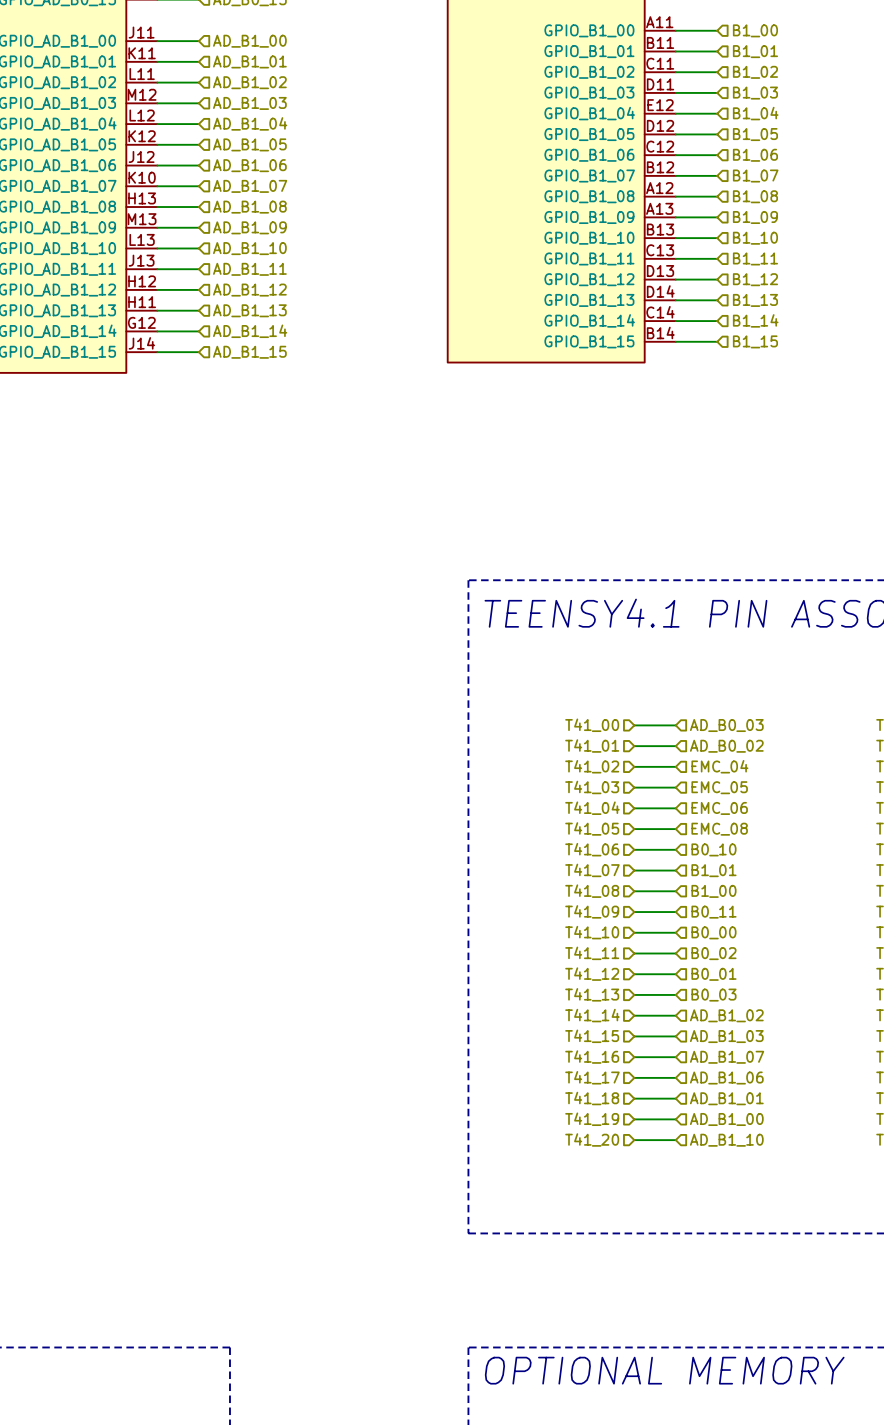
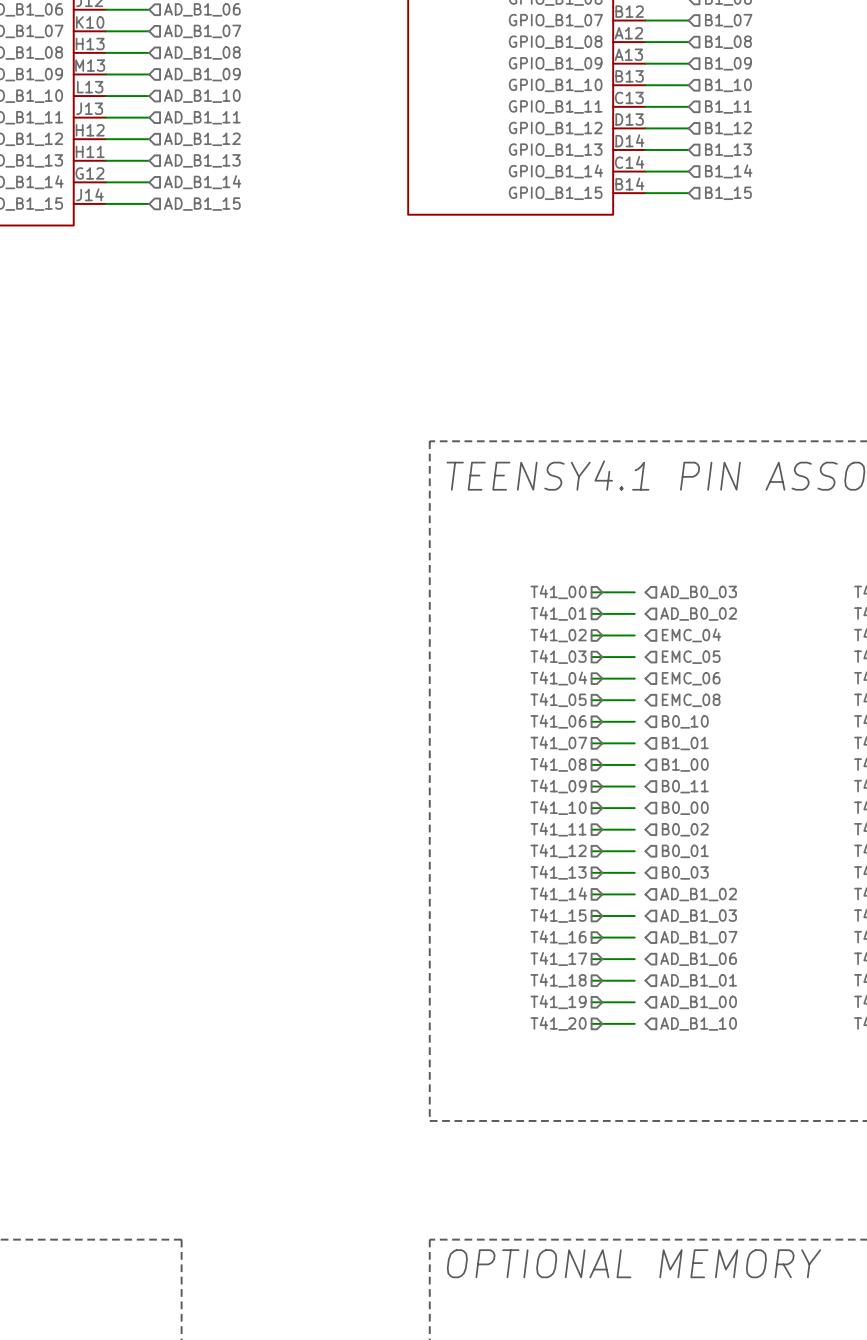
wire: (665, 725) (675, 725) -> (591, 592) (602, 592)
wire: (665, 746) (675, 746) -> (591, 613) (602, 613)
wire: (665, 766) (675, 766) -> (591, 635) (602, 635)
wire: (665, 787) (675, 787) -> (591, 657) (602, 657)
wire: (665, 808) (675, 808) -> (591, 678) (602, 678)
wire: (665, 829) (675, 829) -> (591, 700) (602, 700)
wire: (665, 849) (675, 849) -> (591, 721) (602, 721)
wire: (665, 870) (675, 870) -> (591, 743) (602, 743)
wire: (665, 891) (675, 891) -> (591, 764) (602, 764)
wire: (665, 912) (675, 912) -> (591, 786) (602, 786)
wire: (665, 932) (675, 932) -> (591, 808) (602, 808)
wire: (665, 953) (675, 953) -> (591, 829) (602, 829)
wire: (665, 974) (675, 974) -> (591, 851) (602, 851)
wire: (665, 994) (675, 994) -> (591, 872) (602, 872)
wire: (665, 1015) (675, 1015) -> (591, 894) (602, 894)
wire: (665, 1036) (675, 1036) -> (591, 915) (602, 915)
wire: (665, 1057) (675, 1057) -> (591, 937) (602, 937)
wire: (665, 1077) (675, 1077) -> (591, 959) (602, 959)
wire: (665, 1098) (675, 1098) -> (591, 980) (602, 980)
wire: (665, 1119) (675, 1119) -> (591, 1002) (602, 1002)
wire: (665, 1140) (675, 1140) -> (591, 1023) (602, 1023)

